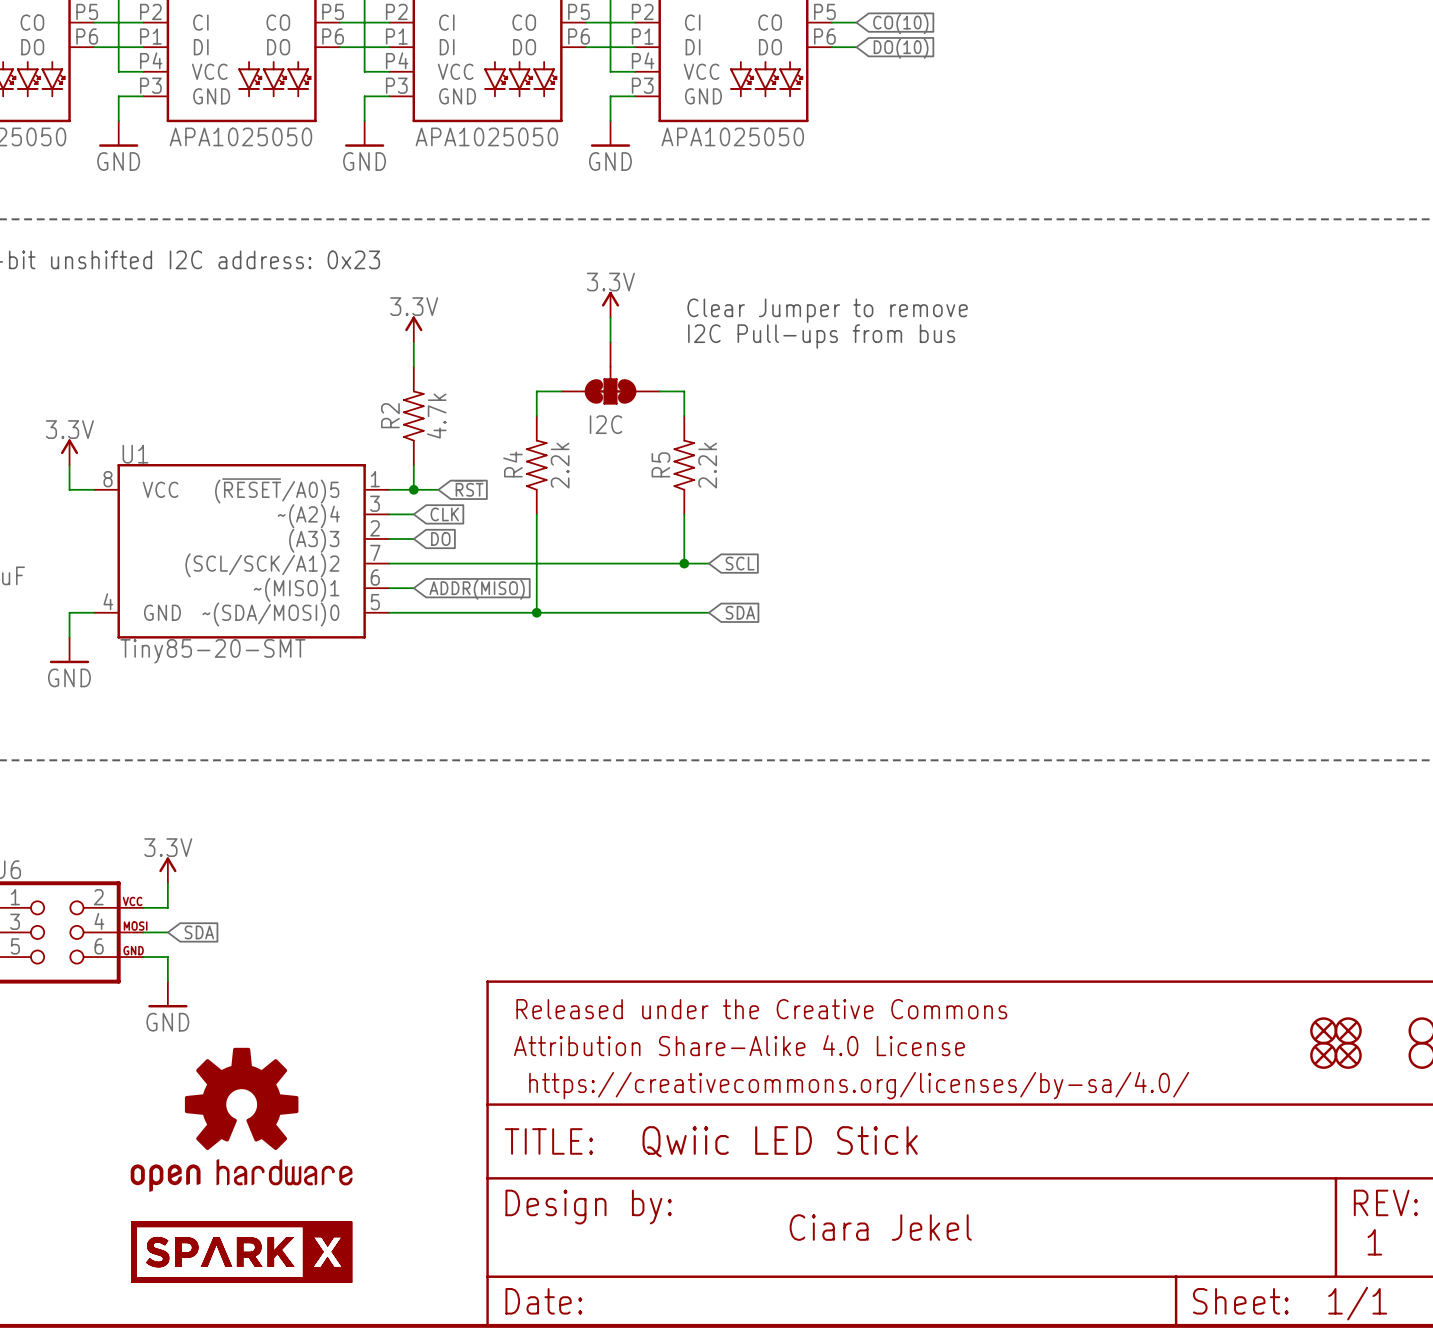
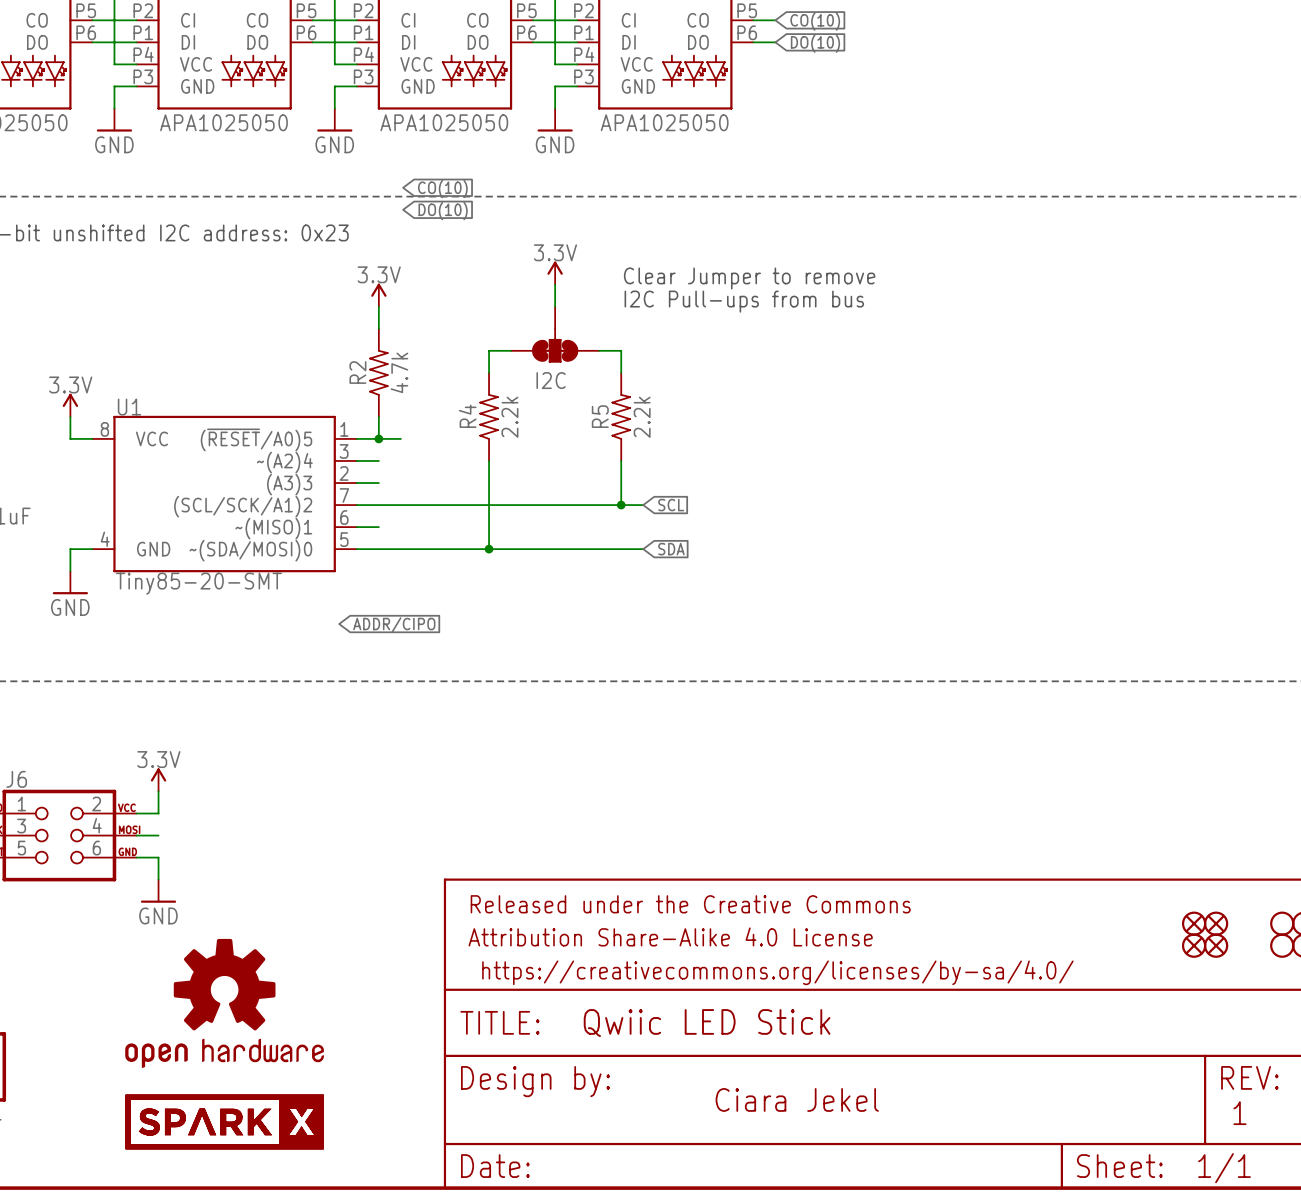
global label: none -> CO(10) (442, 189)
global label: none -> DO(10) (443, 211)
global label: ~{RST} (468, 488) -> none
global label: CLK (444, 514) -> none
global label: DO (440, 538) -> none
global label: ADDR(MISO) (477, 589) -> none
global label: none -> ADDR/CIPO (394, 625)
global label: SDA (199, 932) -> none

